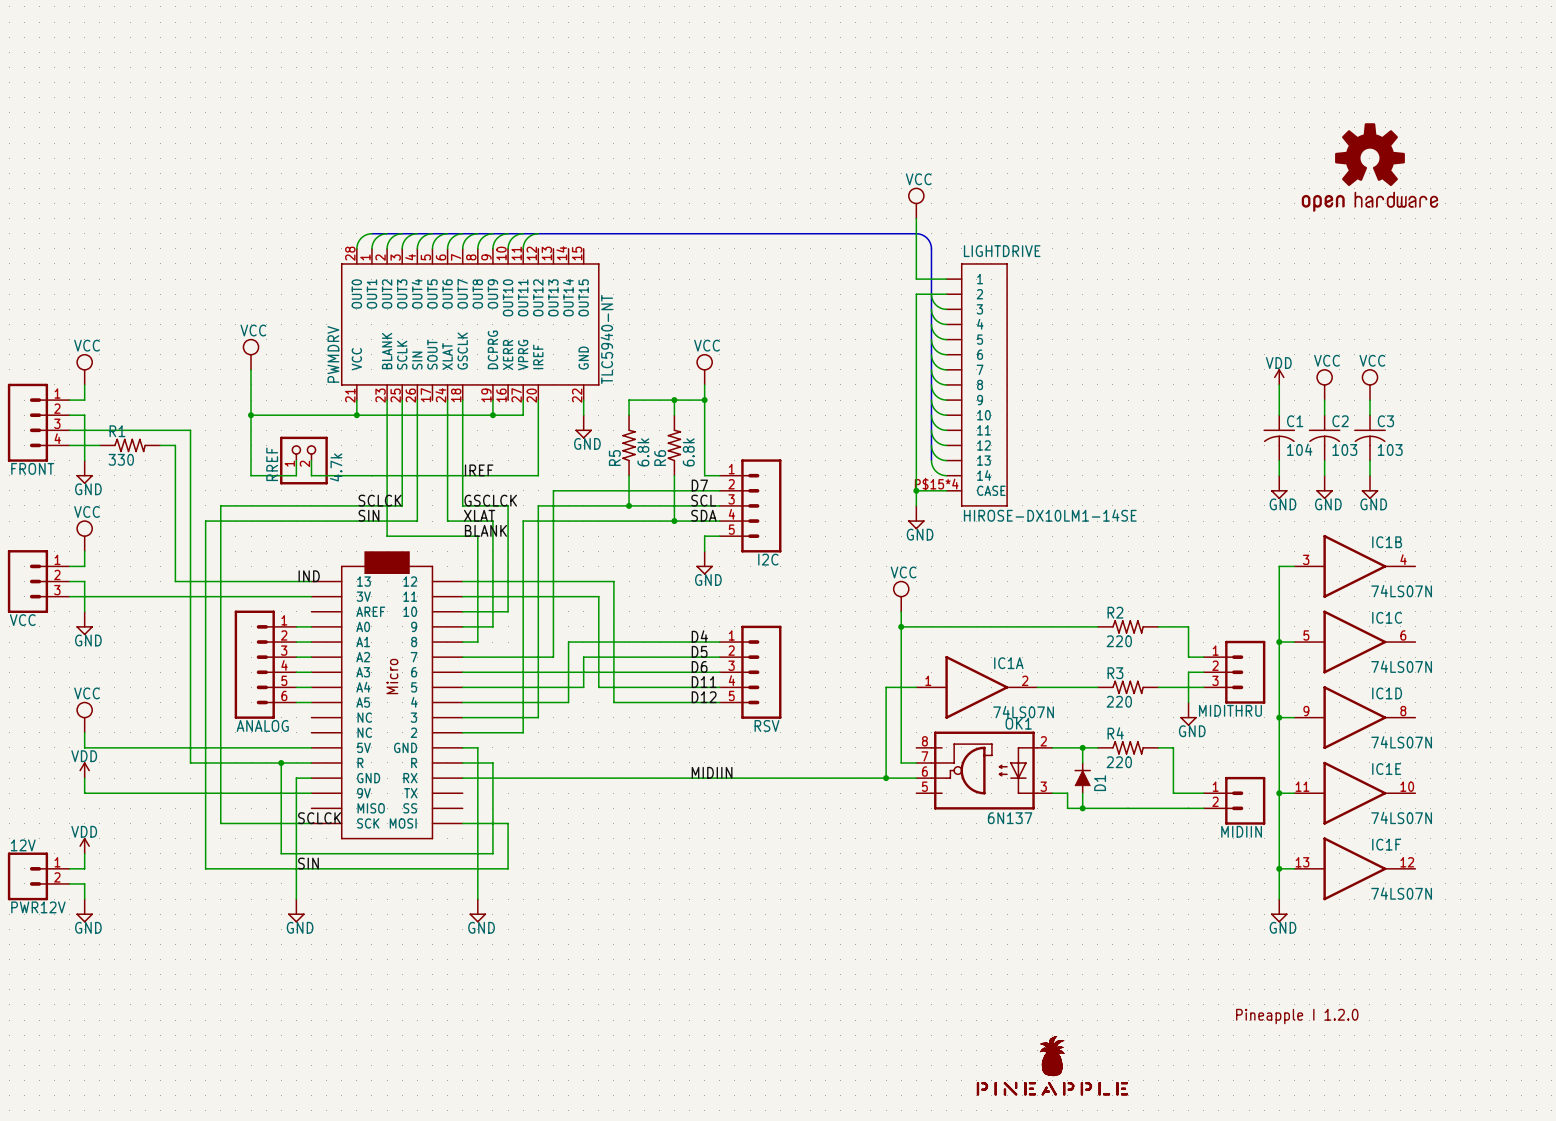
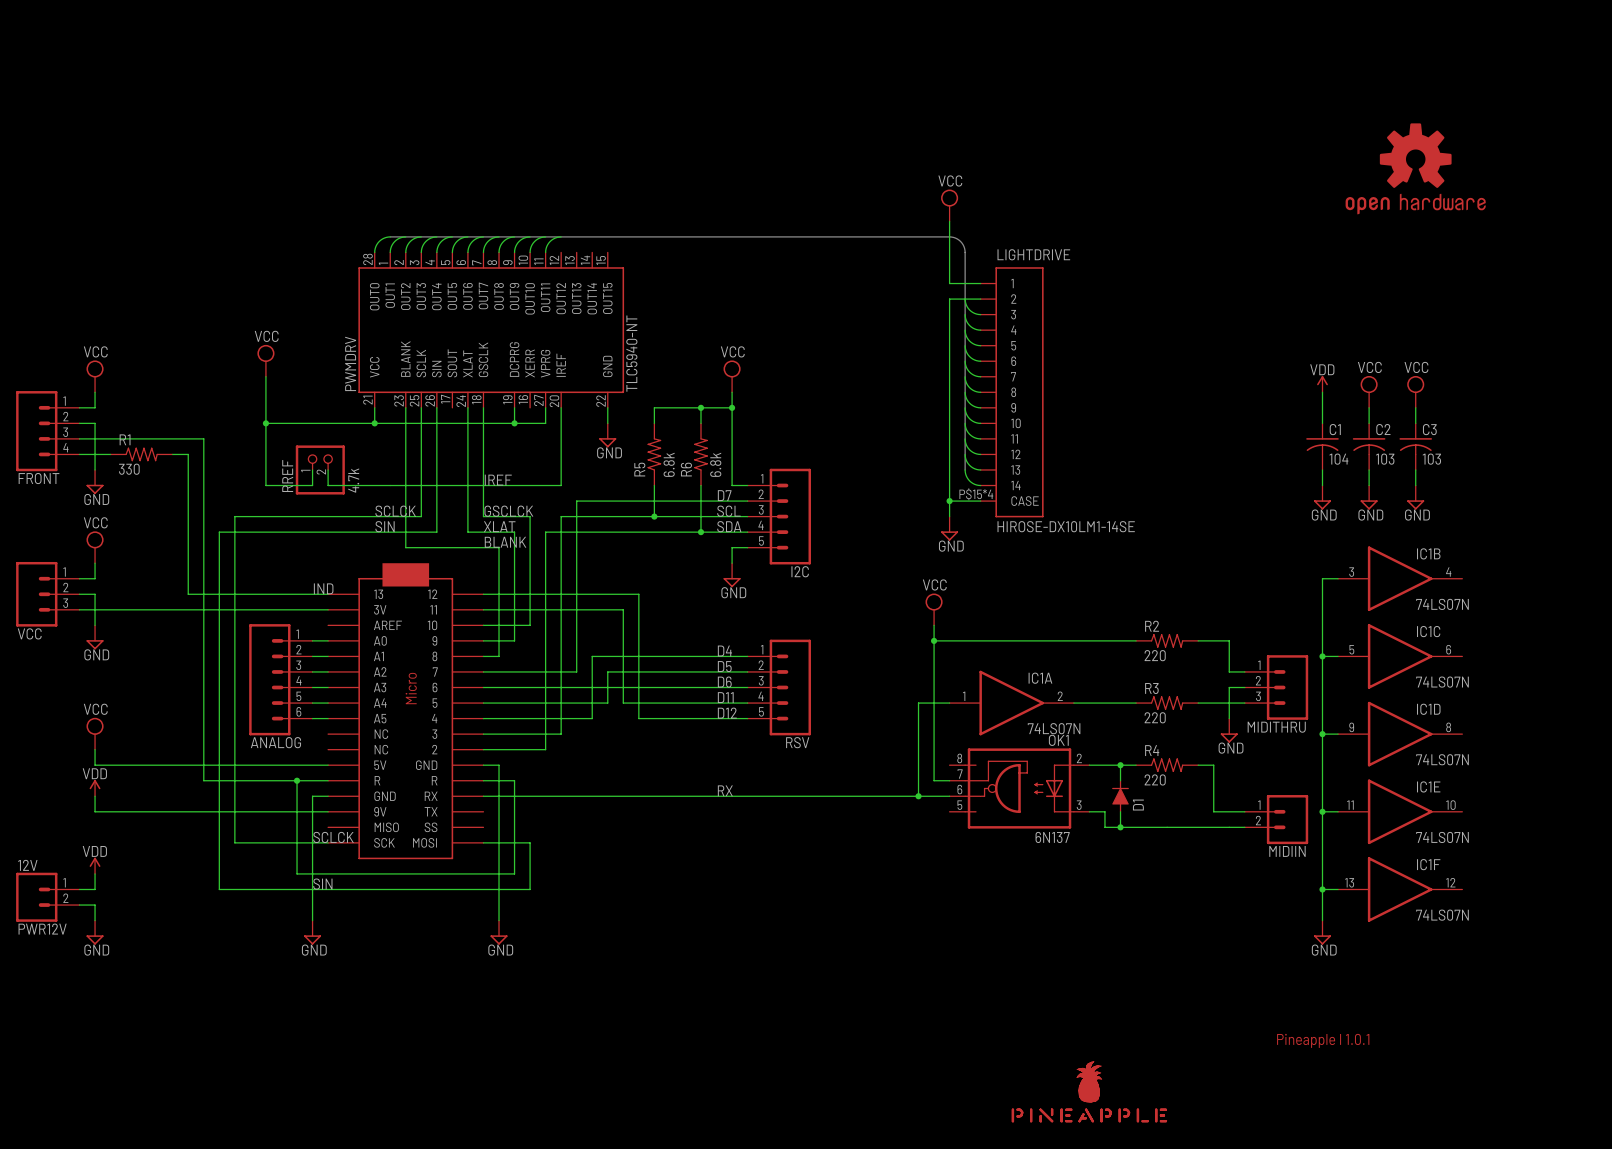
label: MIDIIN (712, 772) -> RX (725, 790)
text: Pineapple I 1.2.0 (1297, 1016) -> Pineapple I 1.0.1 (1323, 1040)

